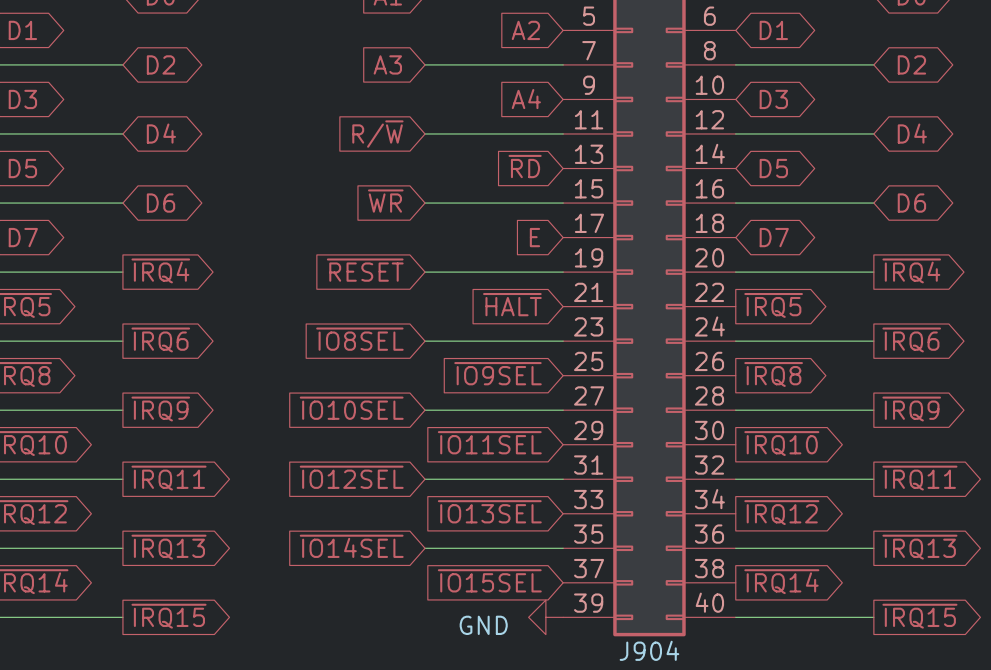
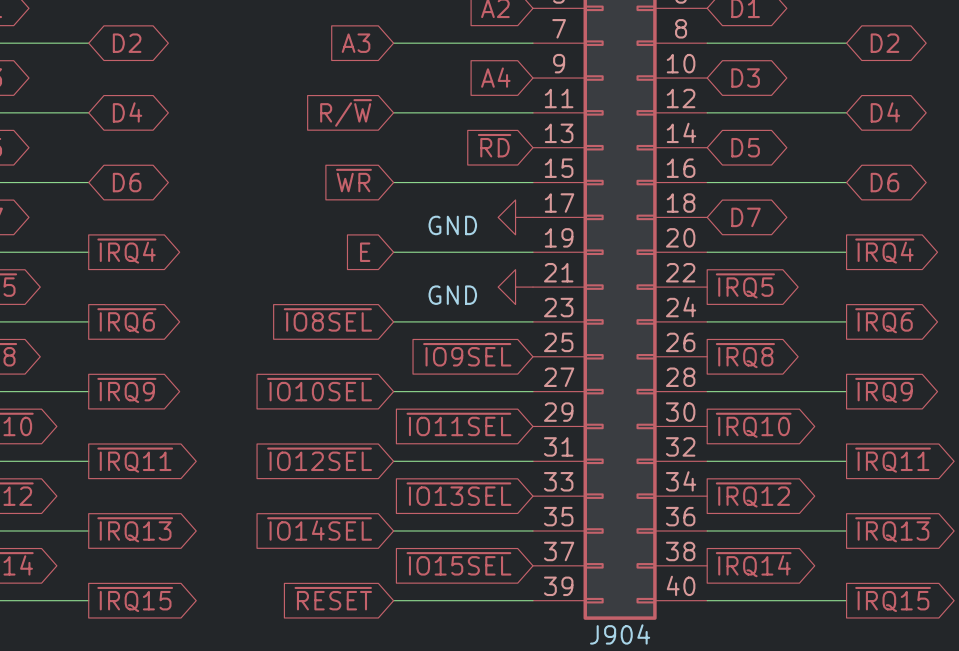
global label: E (534, 237) -> none
power symbol: none -> GND (515, 217)
global label: ~{RESET} (365, 270) -> E (365, 252)
global label: ~{HALT} (512, 304) -> none
power symbol: none -> GND (515, 287)
global label: none -> ~{RESET} (333, 598)
wire: none -> (393, 600) (532, 600)
power symbol: GND (545, 617) -> none

